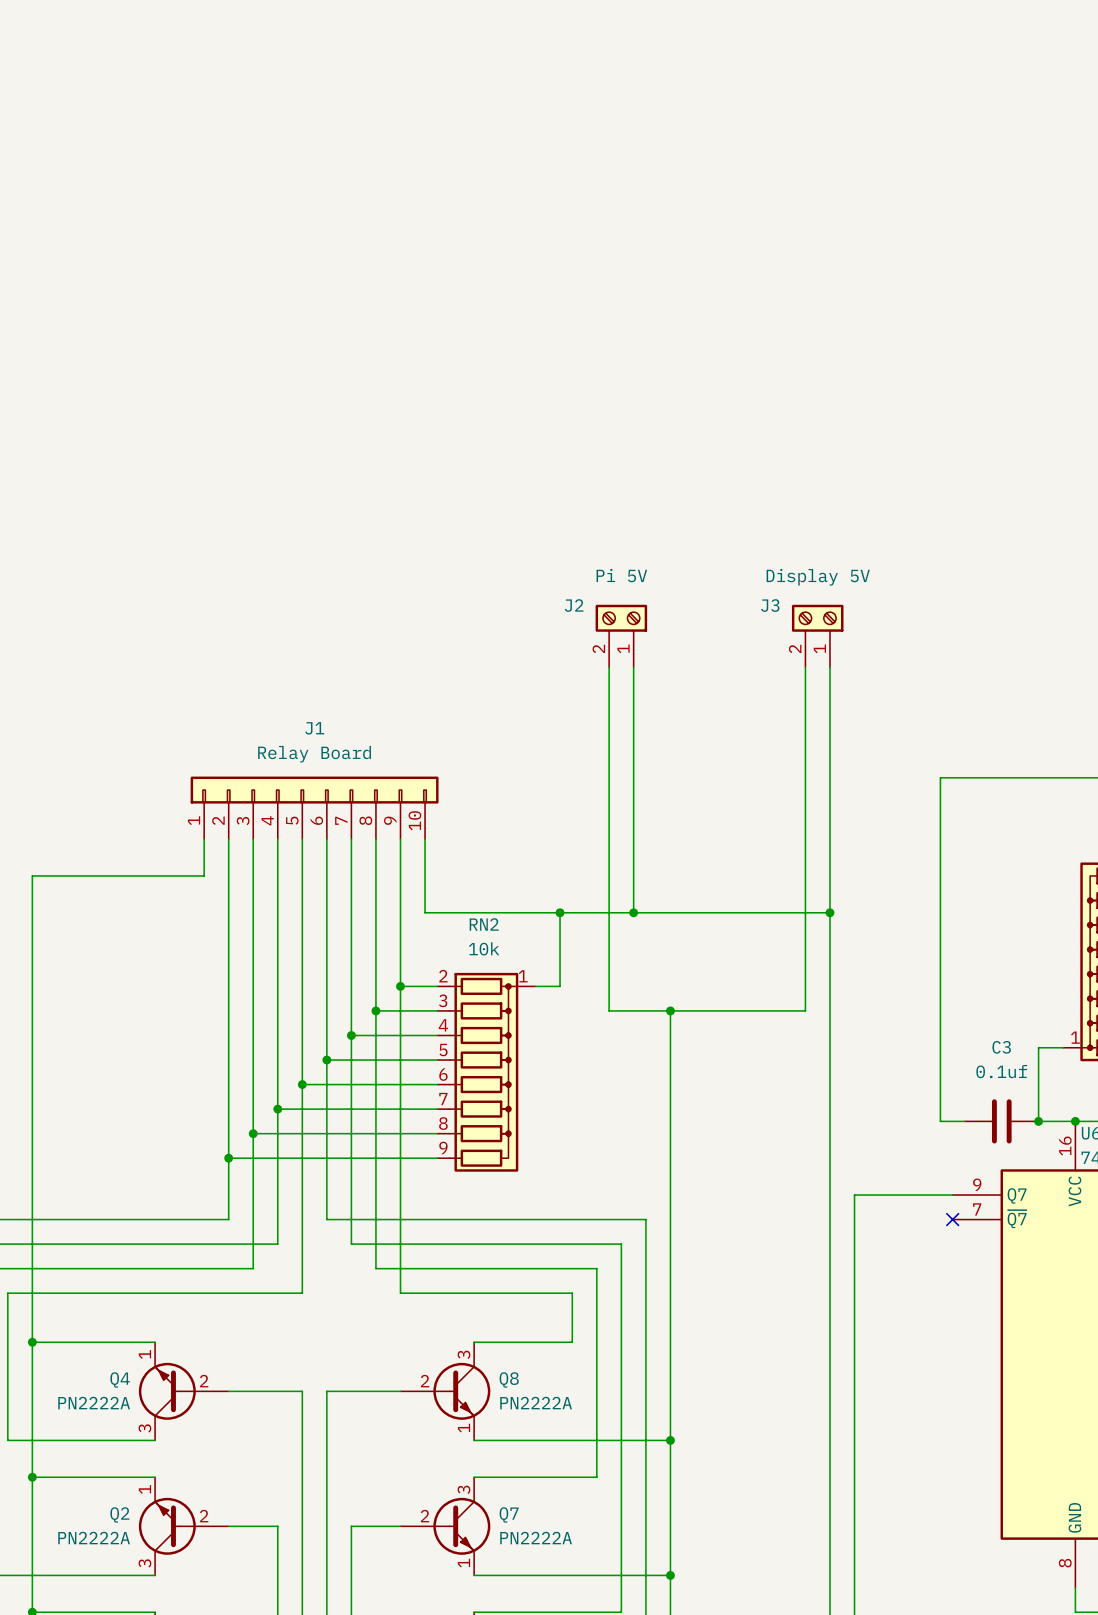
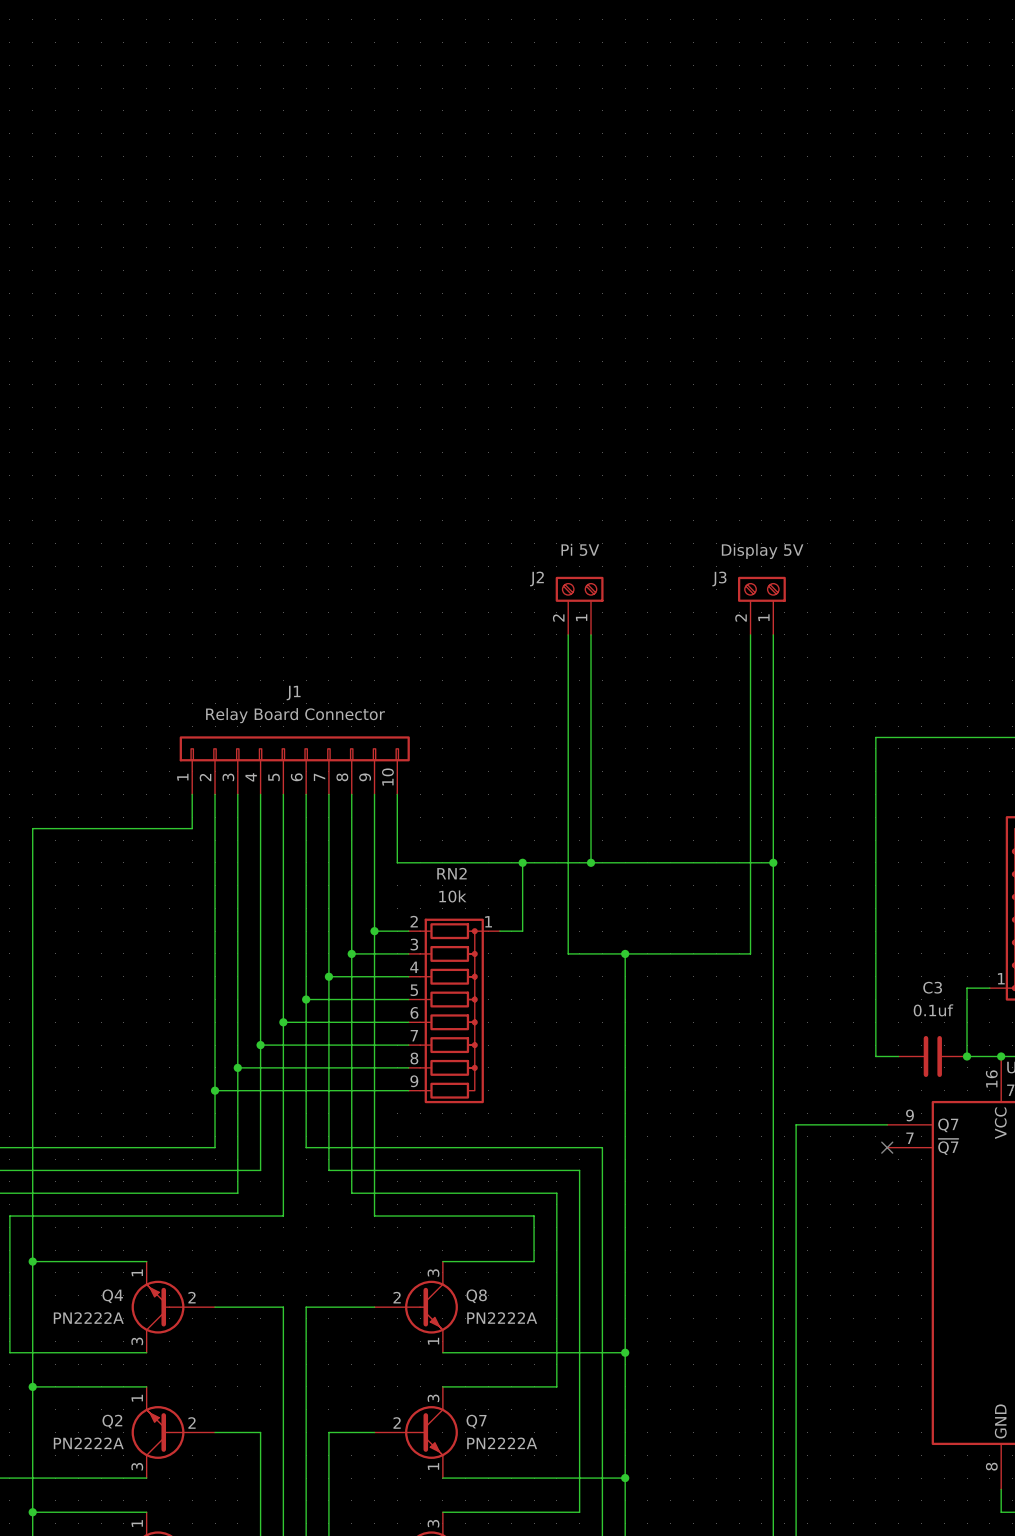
J1 value: Relay Board (314, 754) -> Relay Board Connector (295, 715)

